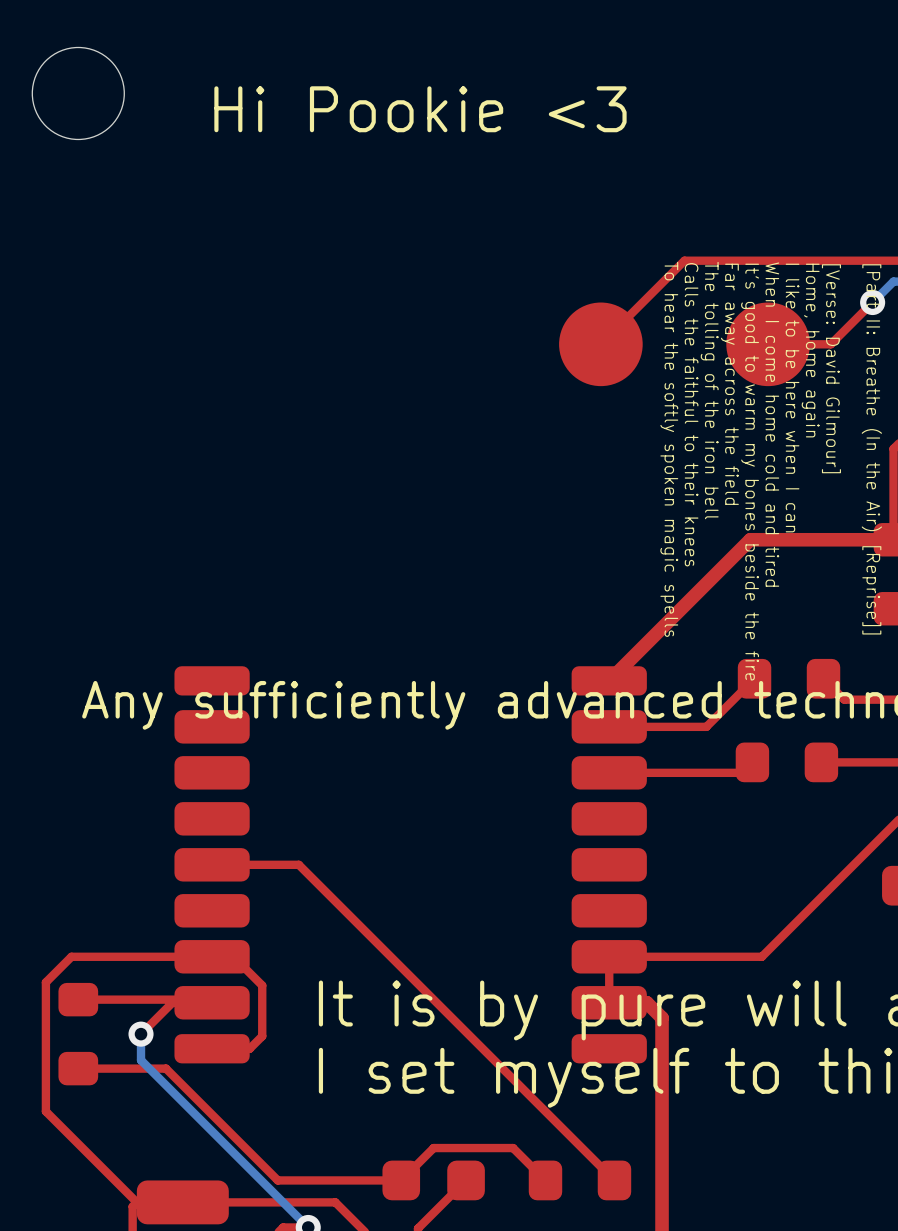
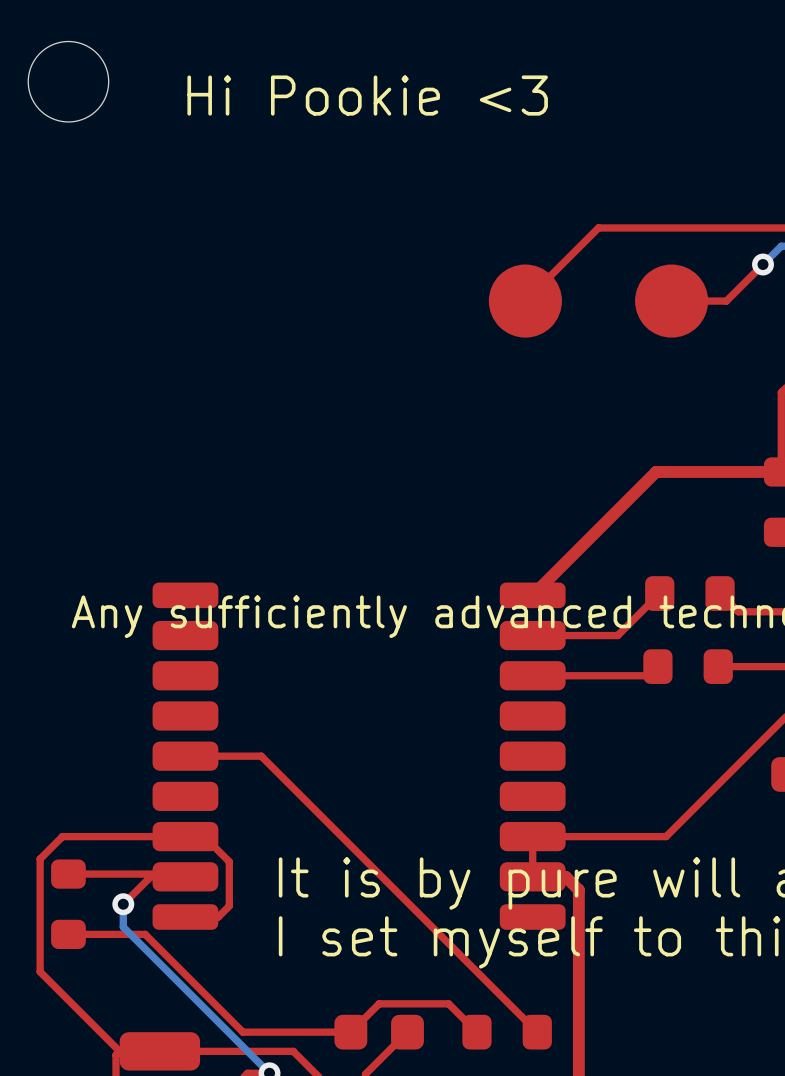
text: Home, home again (810, 350) -> none
text: [Verse: David Gilmour] (831, 368) -> none
text: Far away across the field (729, 384) -> none
text: The tolling of the iron bell (709, 390) -> none
text: I like to be here when I can (792, 398) -> none
text: Calls the faithful to their knees (691, 414) -> none
text: When I come home cold and tired (772, 424) -> none
text: To hear the softly spoken magic spells (669, 449) -> none
text: [Part II: Breathe (In the Air) [Reprise]] (871, 449) -> none
text: It's good to warm my bones beside the fire (750, 472) -> none

